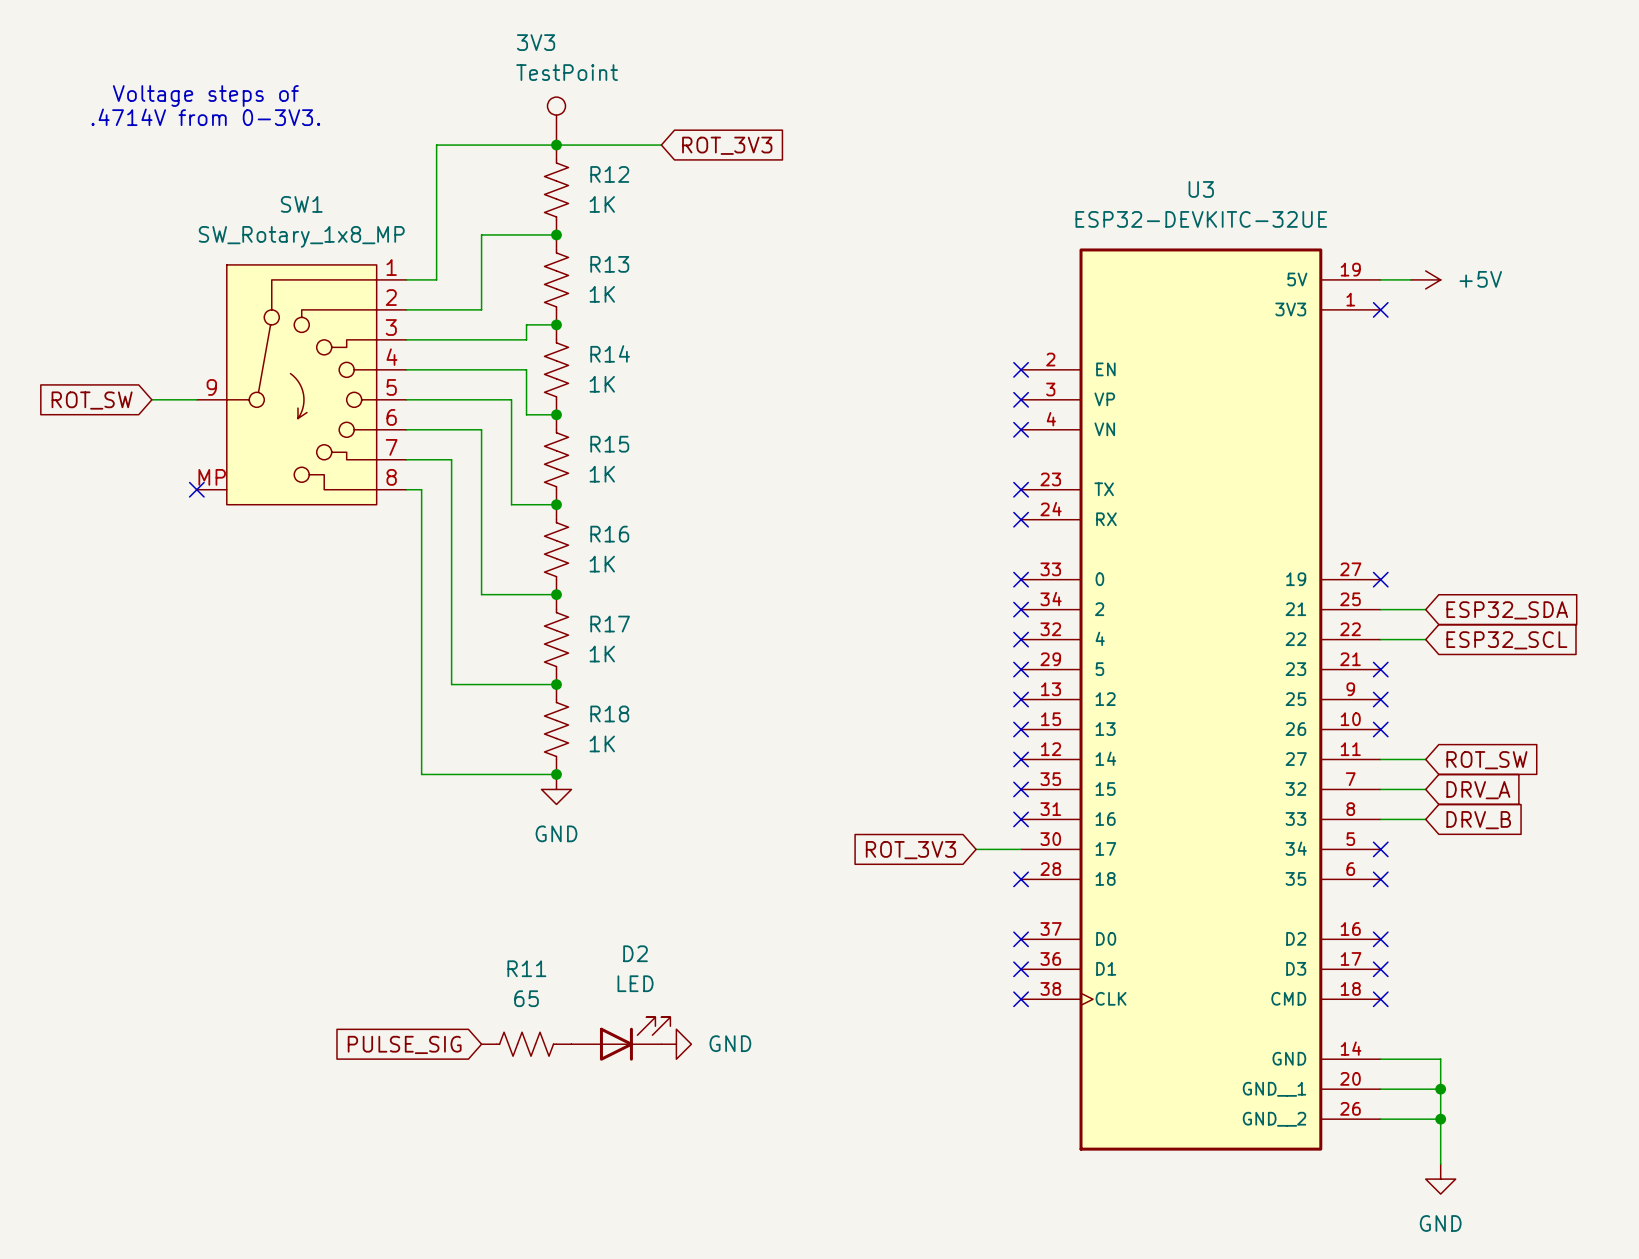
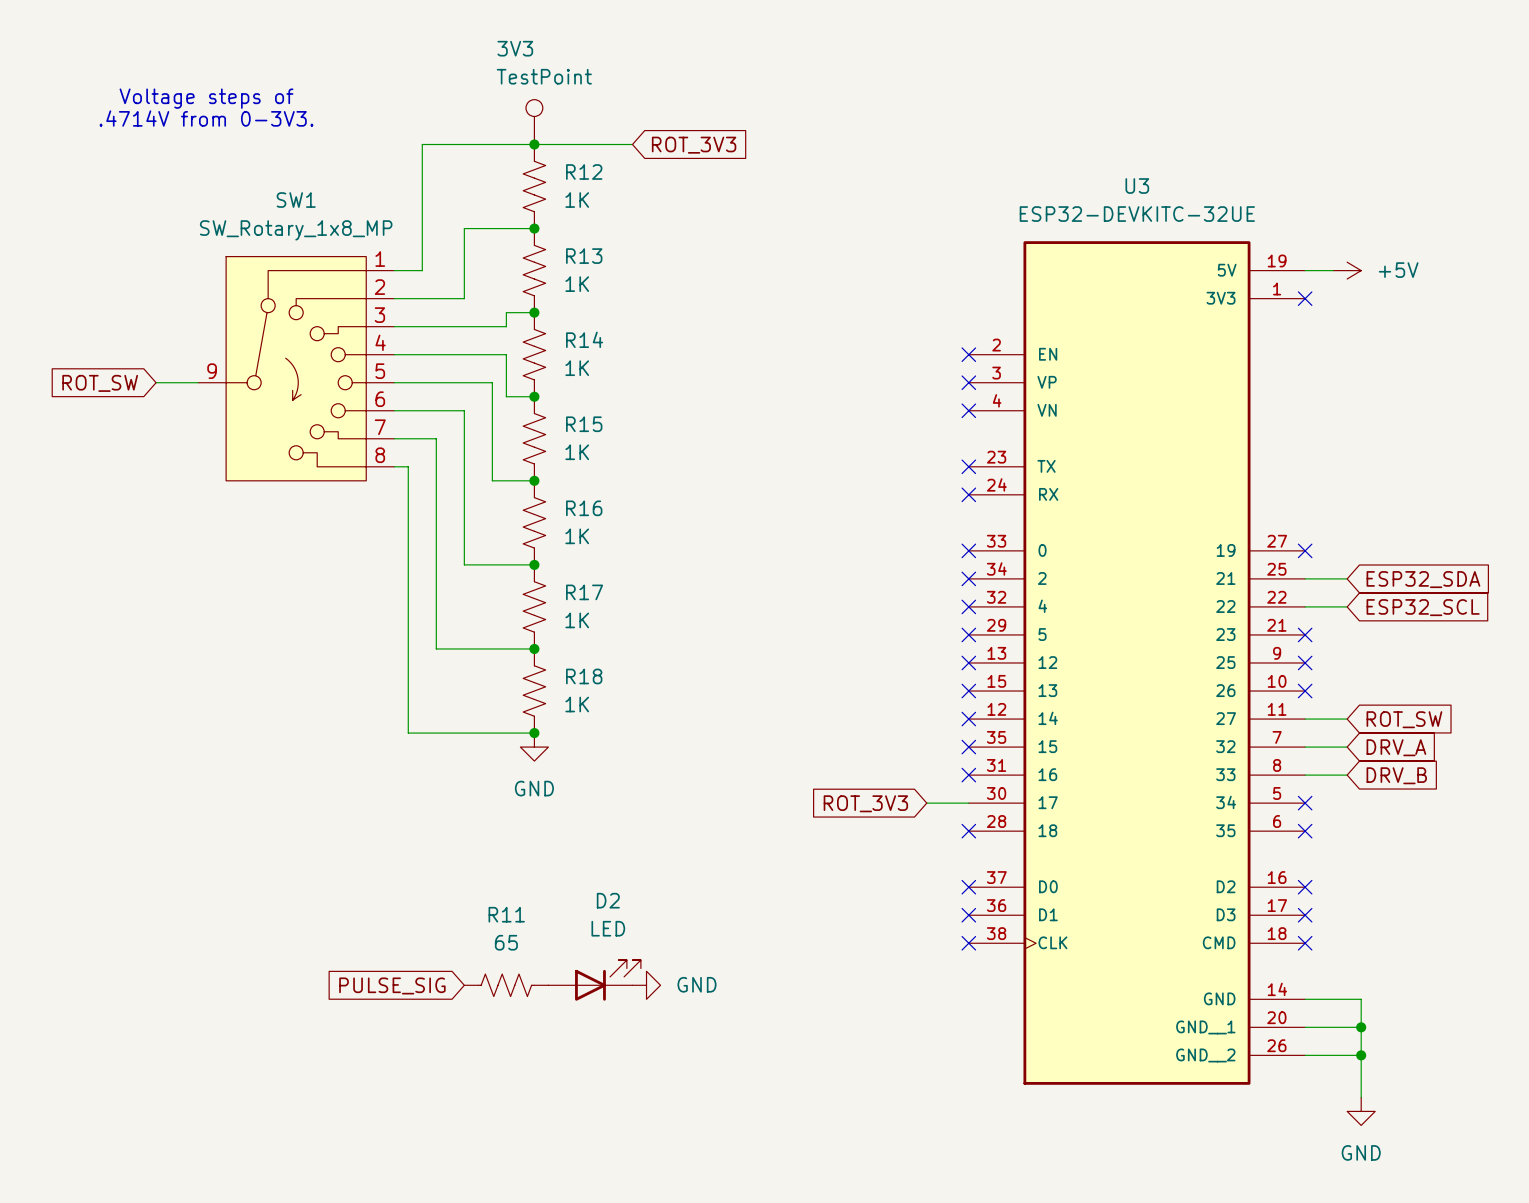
SW1 symbol: [196, 264, 407, 505] -> [198, 256, 395, 481]
no-connect mark: (196, 489) -> none

